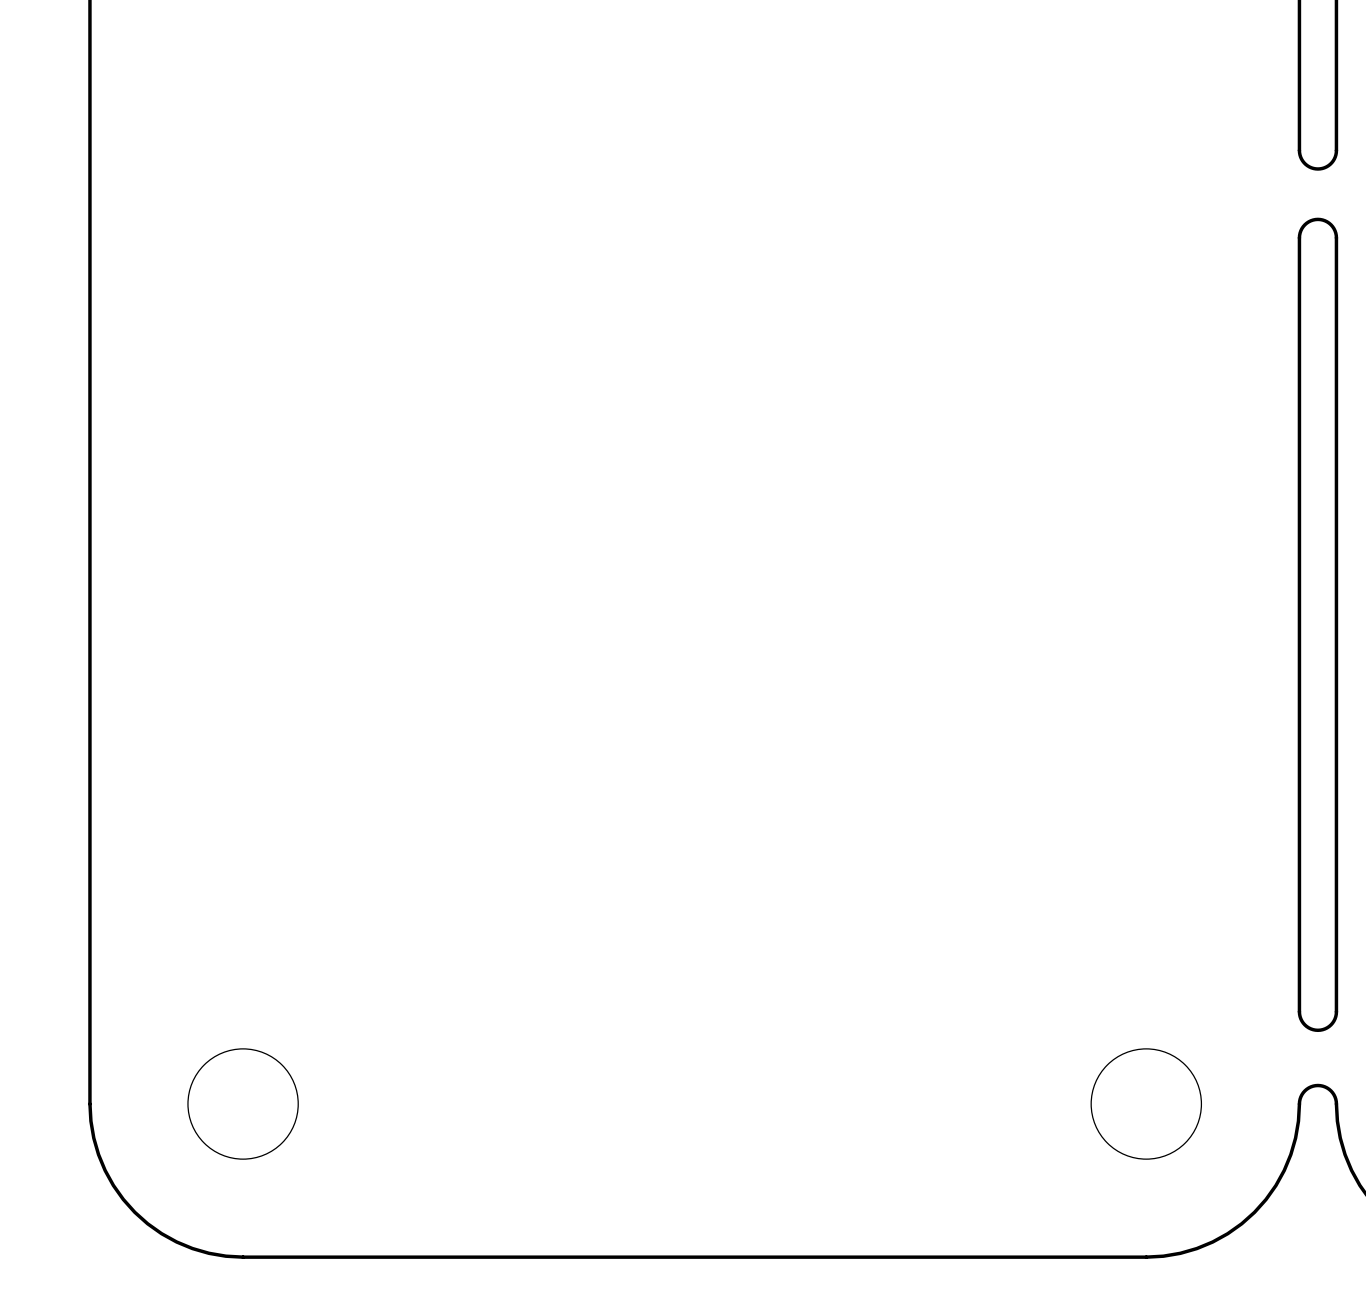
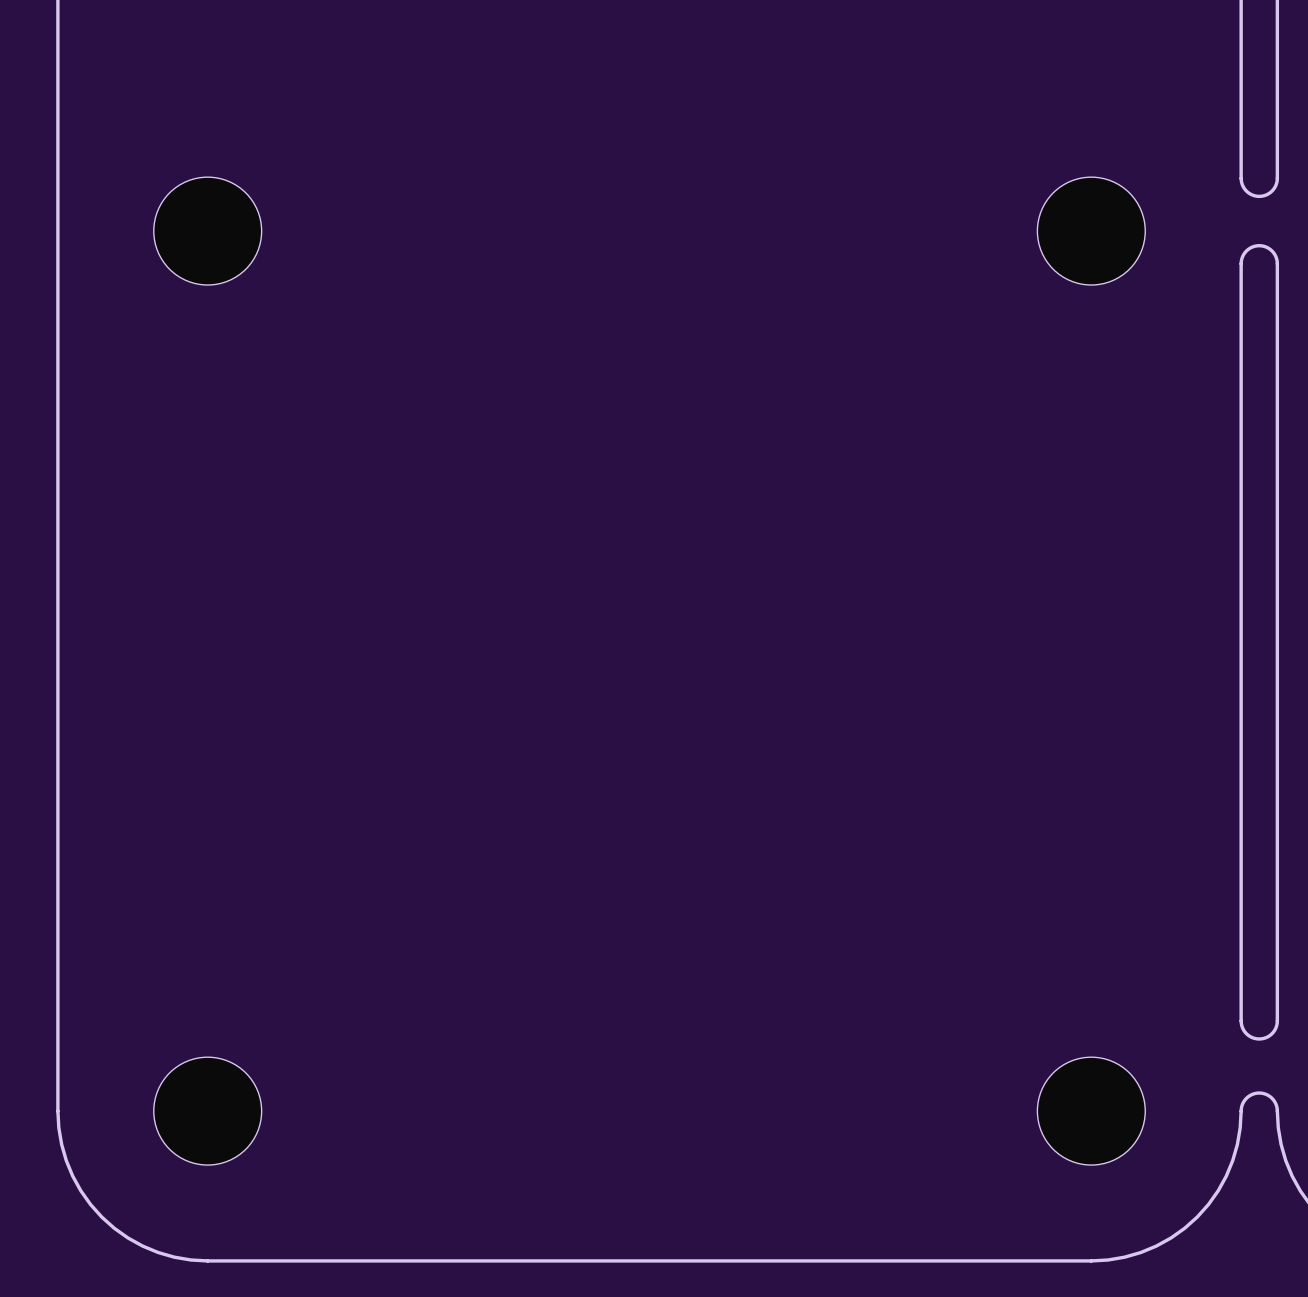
part: none -> (207, 231)
part: none -> (1091, 231)

